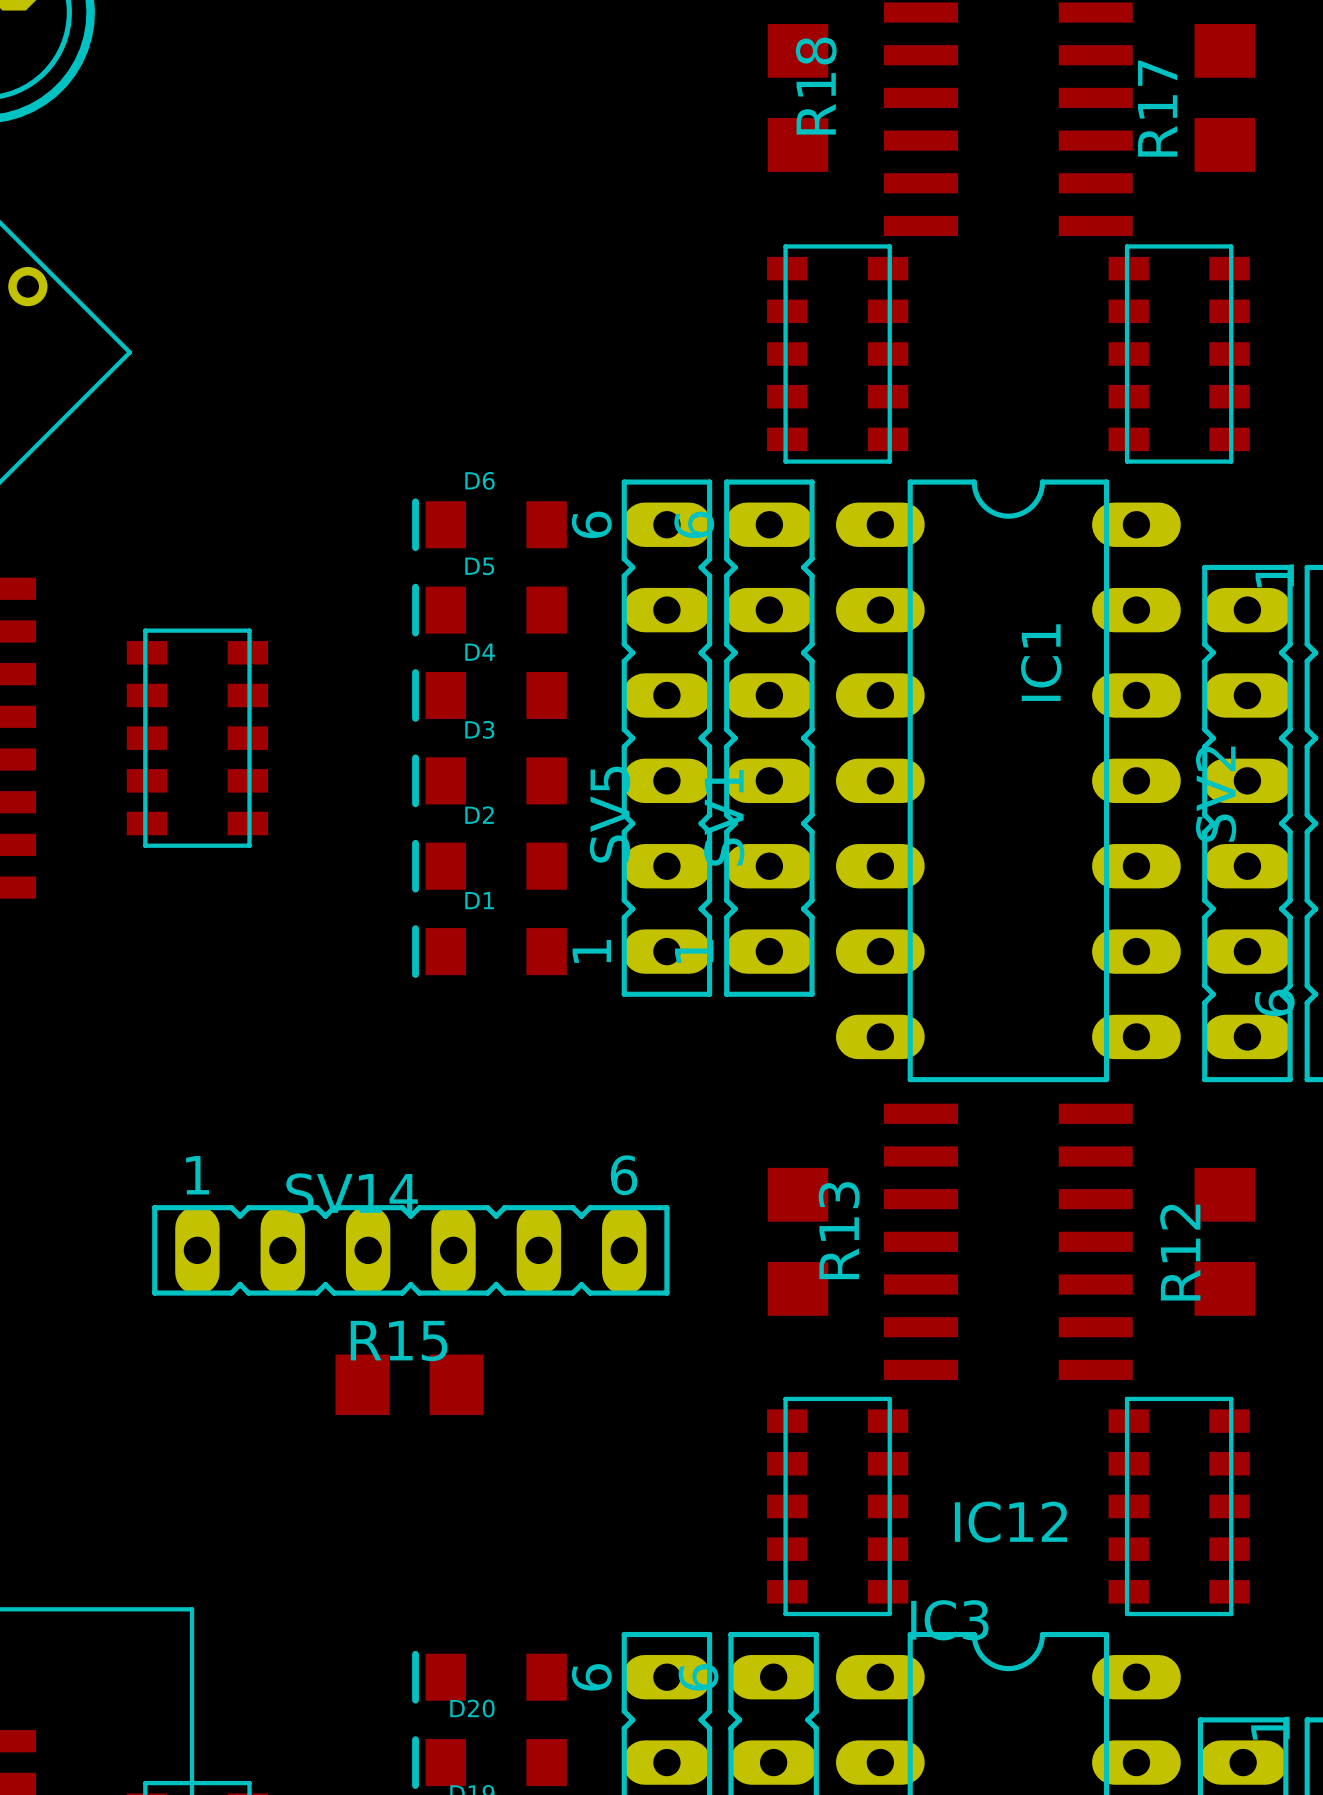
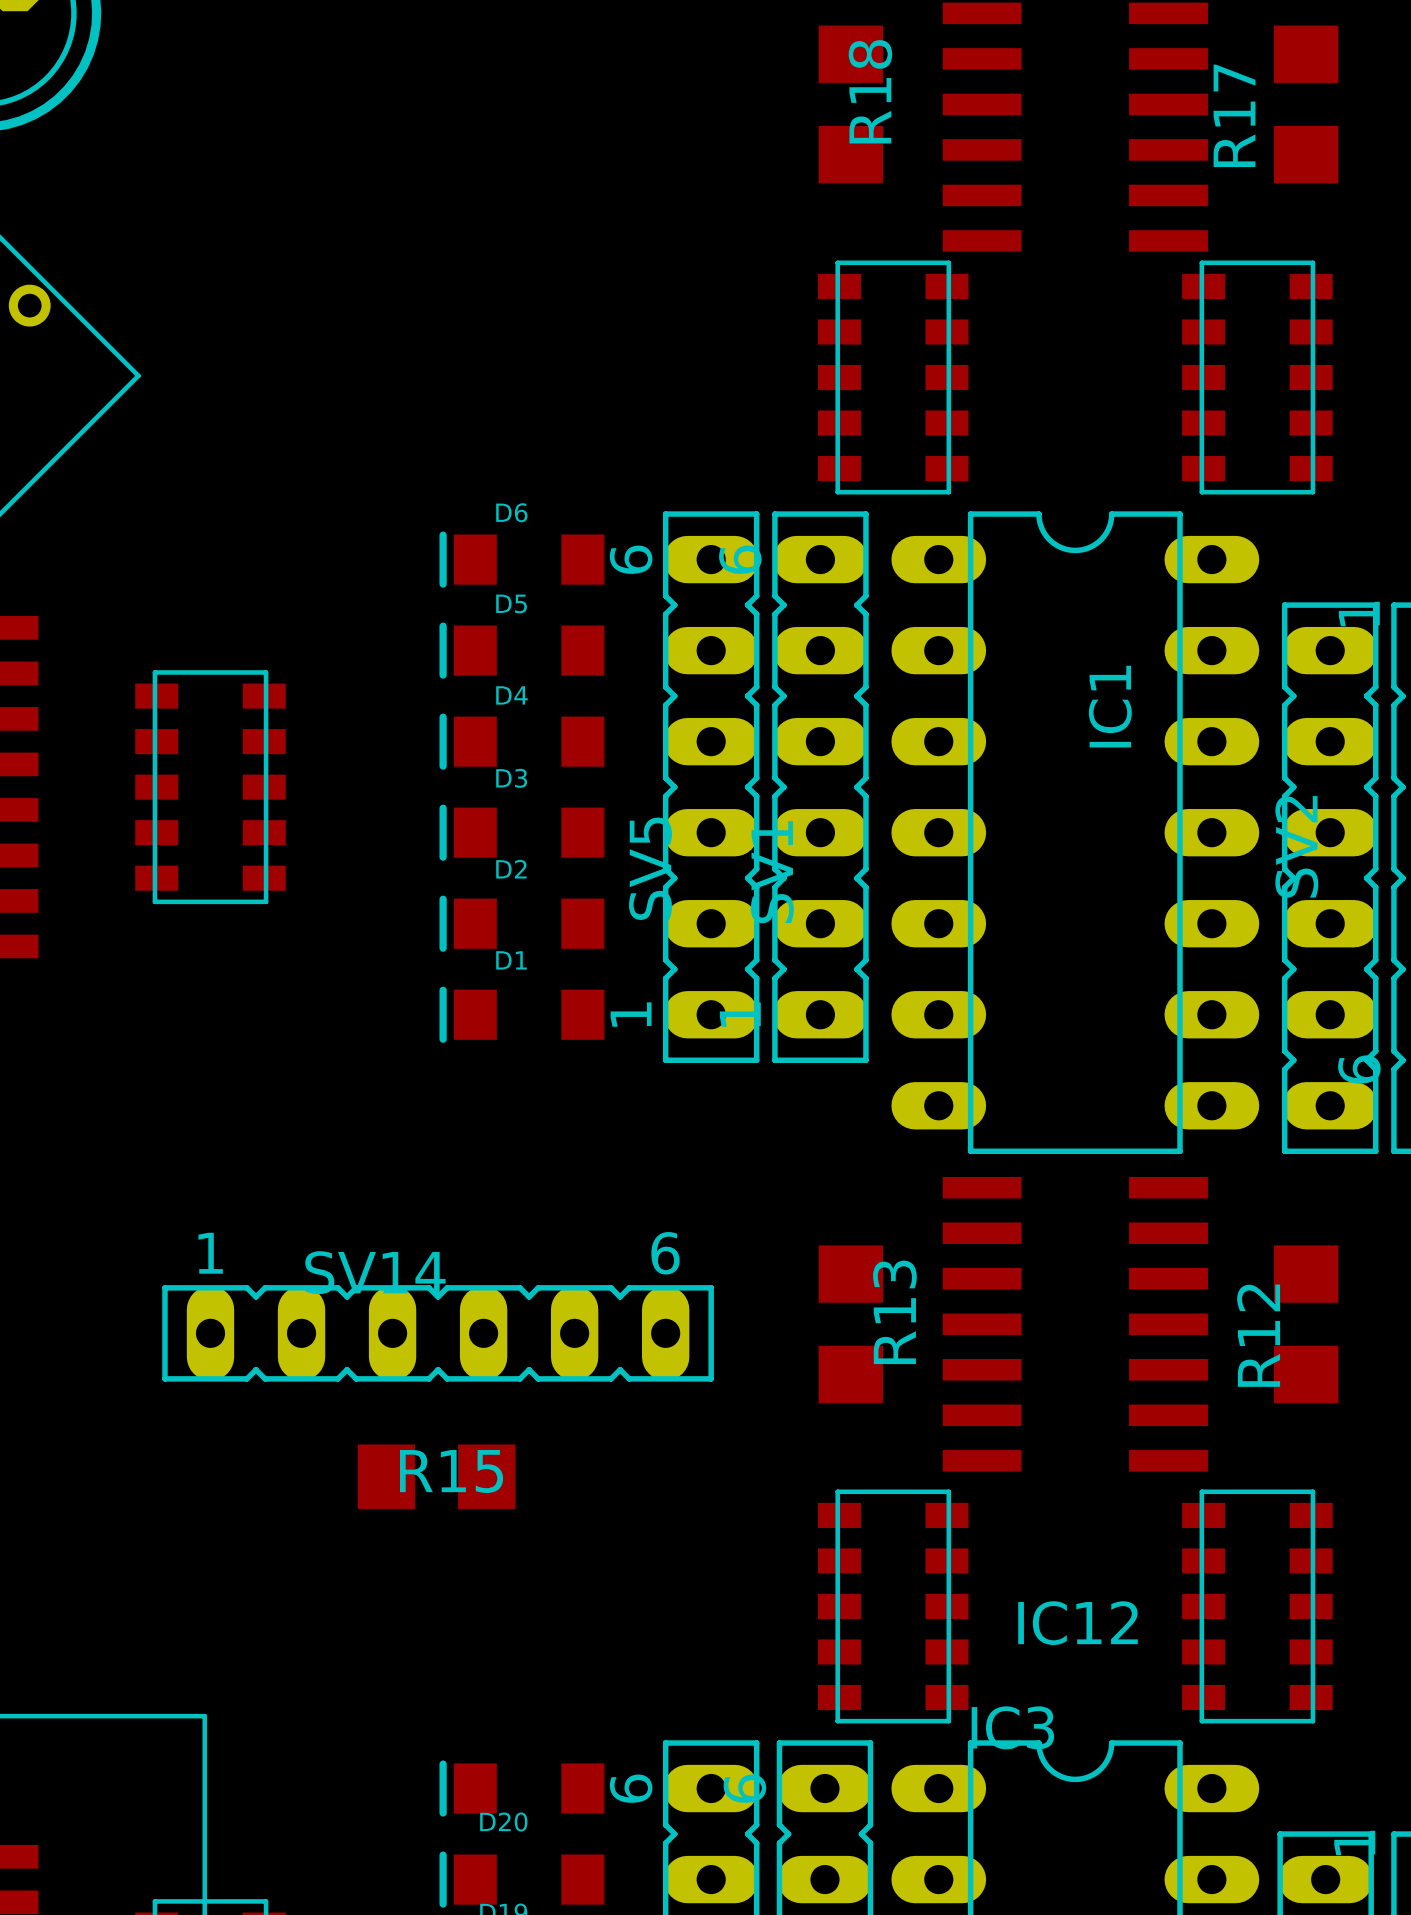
R15 name position: R15 (399, 1341) -> R15 (451, 1471)

